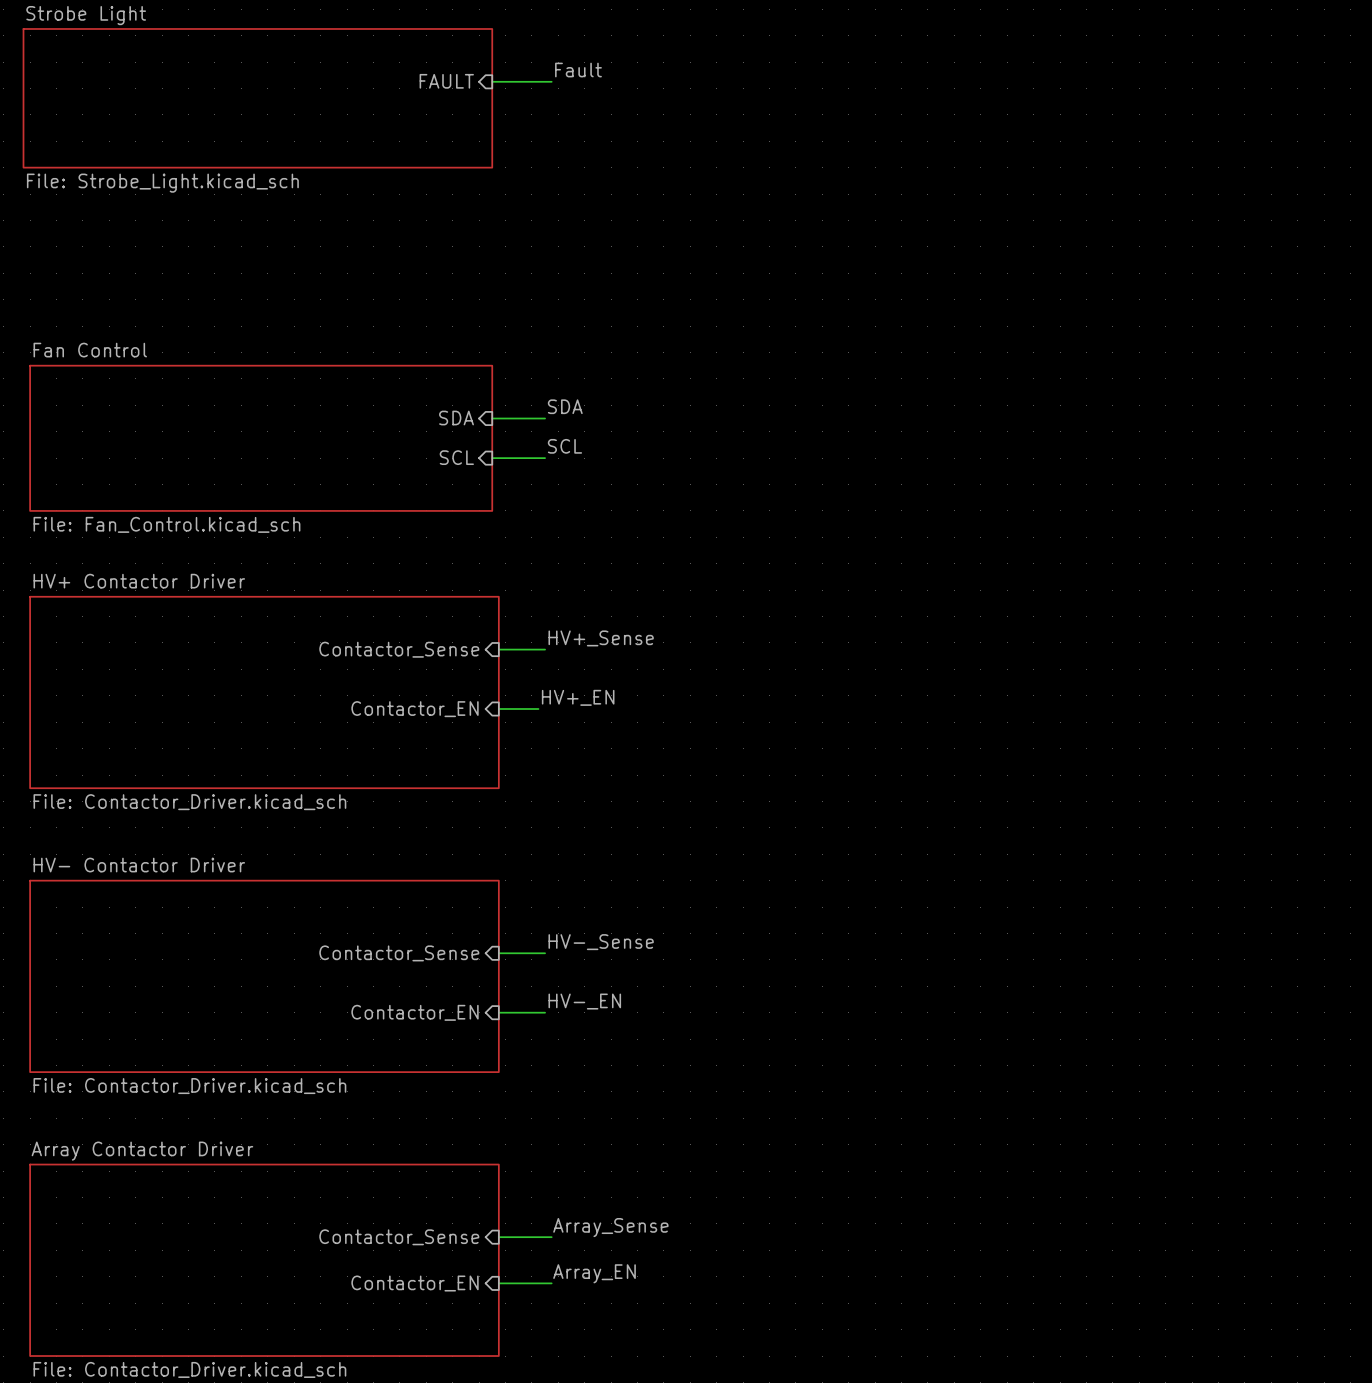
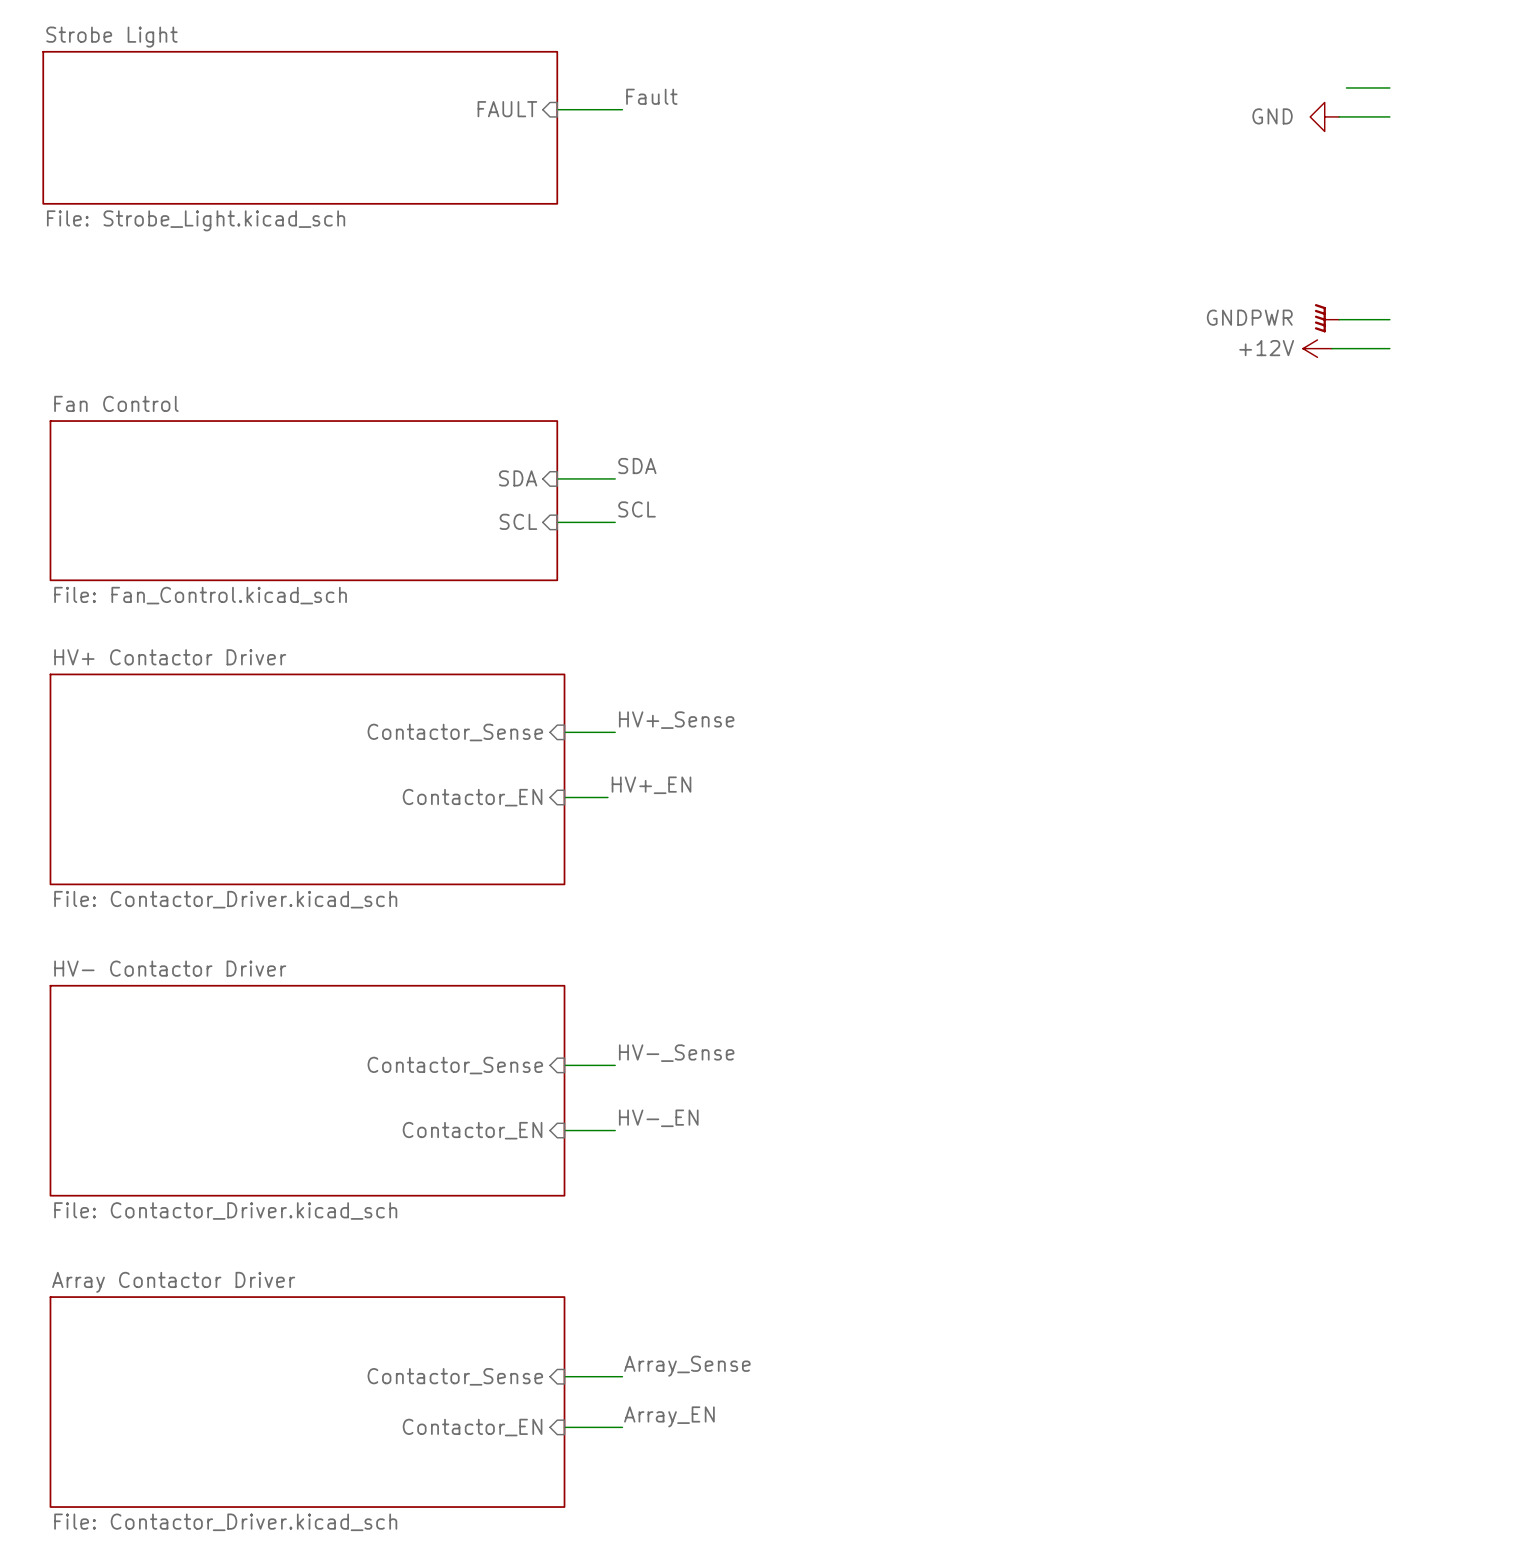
wire: none -> (1346, 87) (1389, 87)
power symbol: none -> GND (1324, 116)
wire: none -> (1339, 116) (1389, 116)
power symbol: none -> GNDPWR (1327, 318)
wire: none -> (1339, 319) (1389, 319)
power symbol: none -> +12V (1317, 348)
wire: none -> (1331, 348) (1389, 348)

